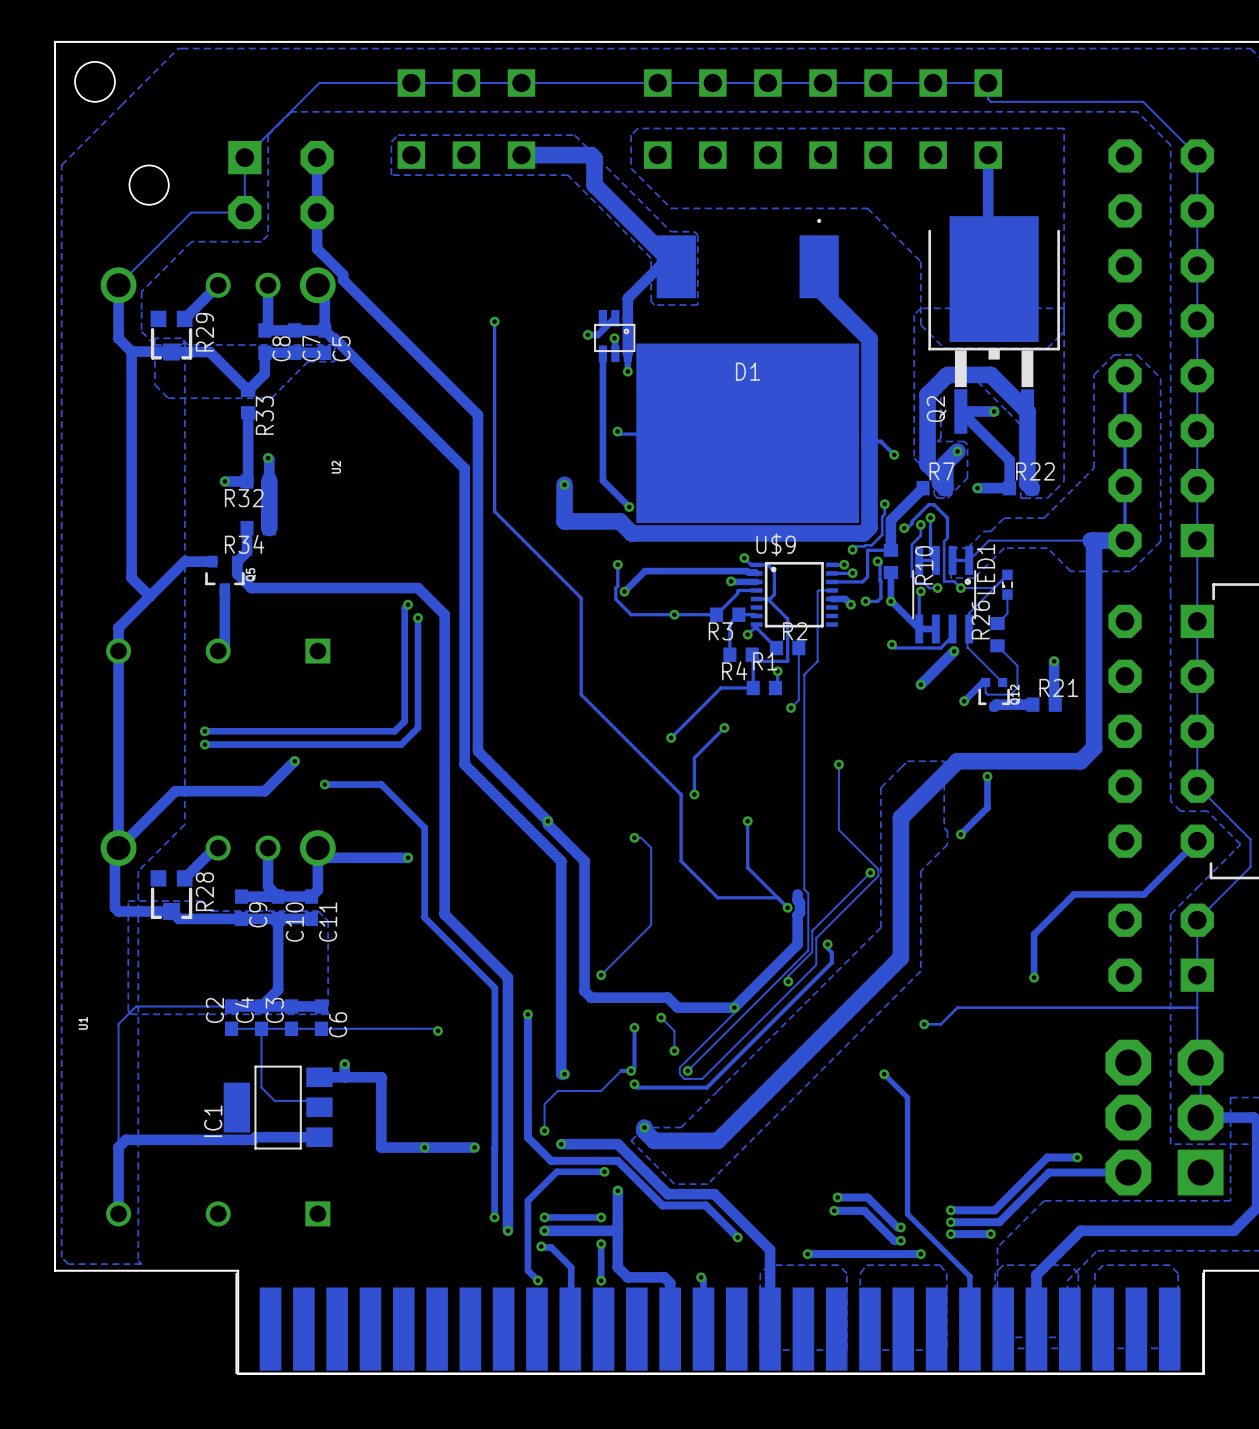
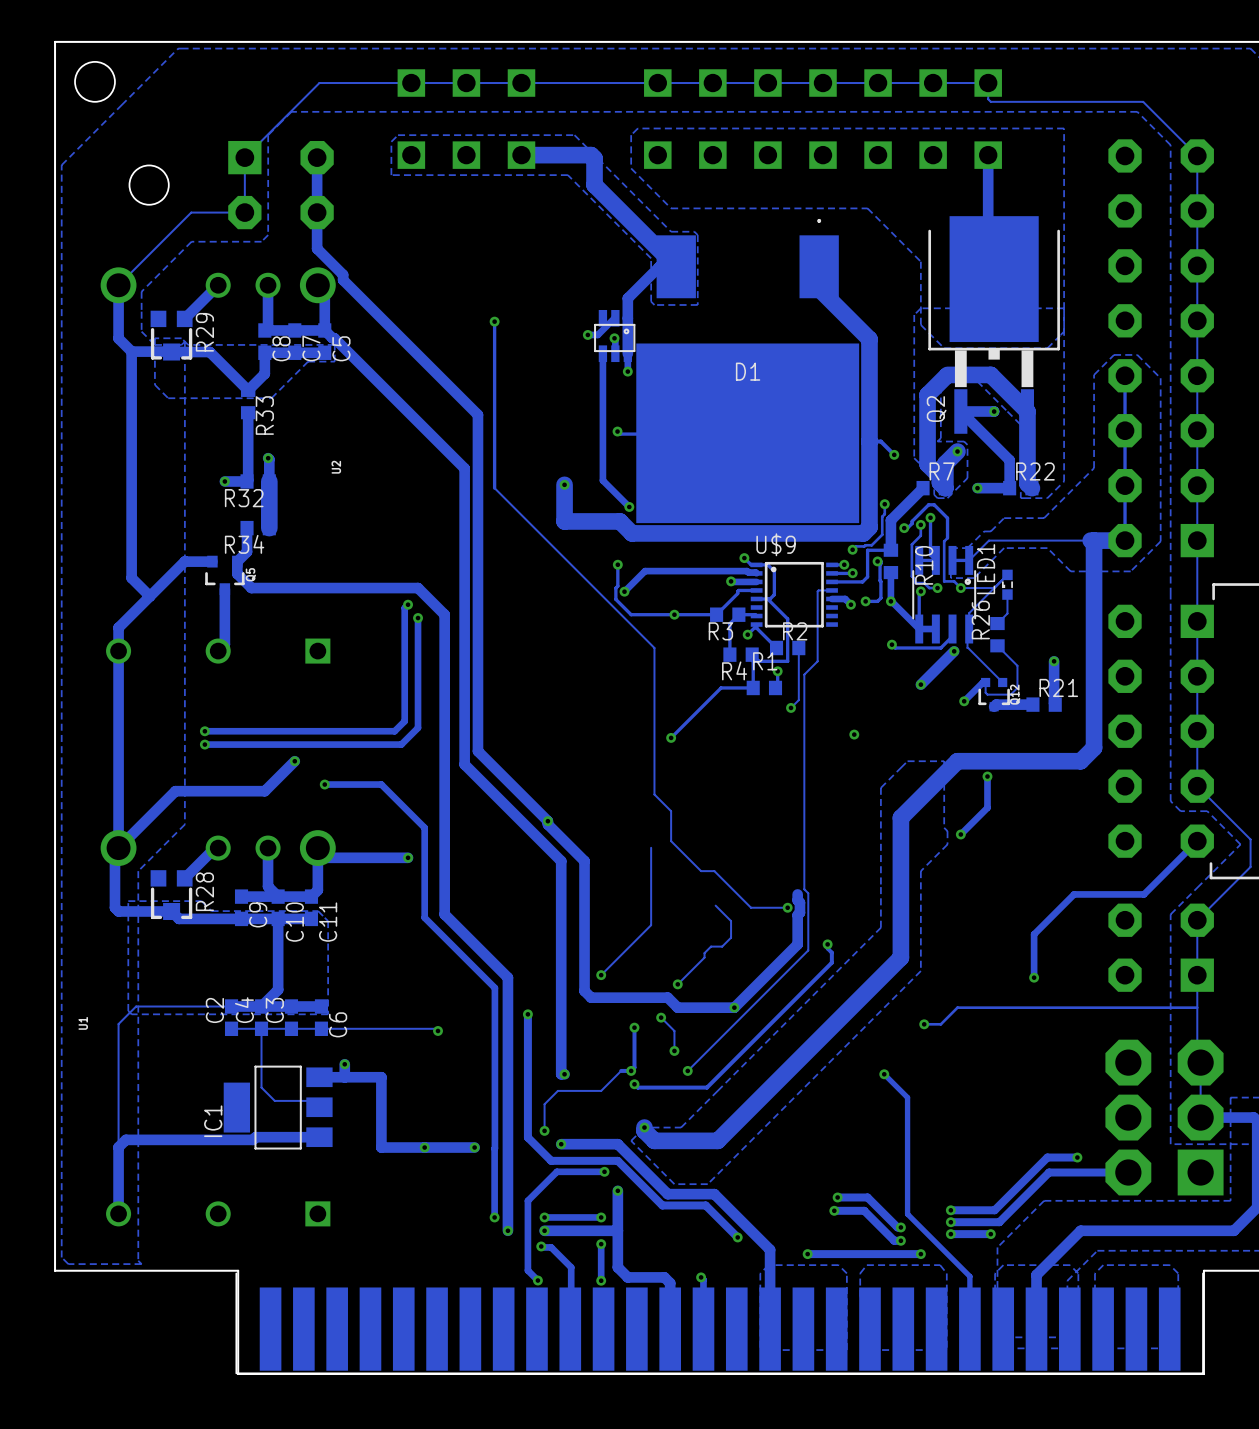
track: (494, 488) (494, 511) (581, 598) (581, 694) (681, 794) (681, 861) (717, 897) (777, 897) -> (494, 488) (654, 648) (654, 794) (671, 811) (671, 841) (701, 871) (714, 871) (751, 907) (787, 907)
track: (724, 727) (694, 757) (694, 794) -> none
via: (724, 727) -> none
track: (838, 764) (838, 830) (878, 869) (878, 876) (816, 938) (816, 964) (702, 1078) (684, 1078) (679, 1074) (679, 1067) (797, 949) (797, 894) -> none
via position: (838, 764) -> (854, 734)
via: (694, 794) -> none
track: (747, 821) (747, 867) (787, 907) -> none
via: (747, 821) -> none
track: (634, 837) (641, 837) (651, 847) -> none
via: (634, 837) -> none
track: (870, 872) (812, 930) (812, 952) (788, 976) (788, 981) -> none
via: (870, 872) -> none
track: none -> (715, 905) (731, 921) (731, 937) (722, 946) (711, 946) (704, 953) (704, 957) (677, 984)
via: (788, 981) -> none
via: none -> (677, 984)

